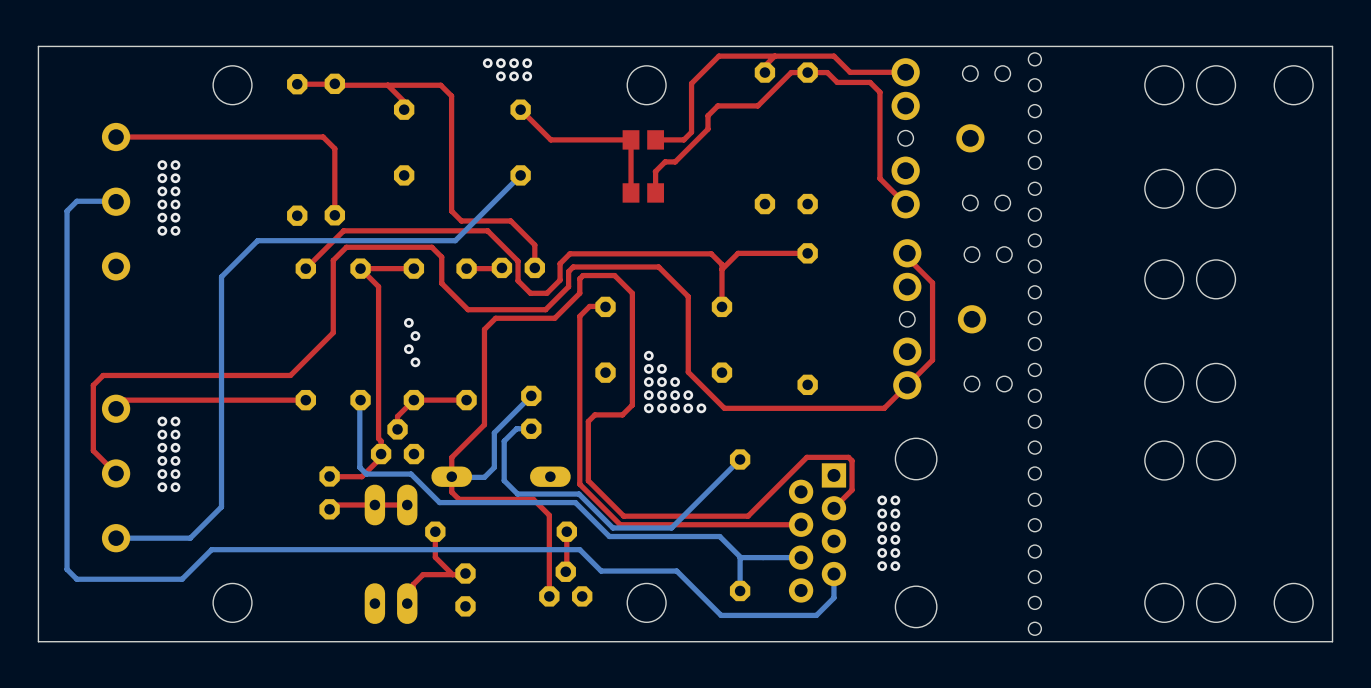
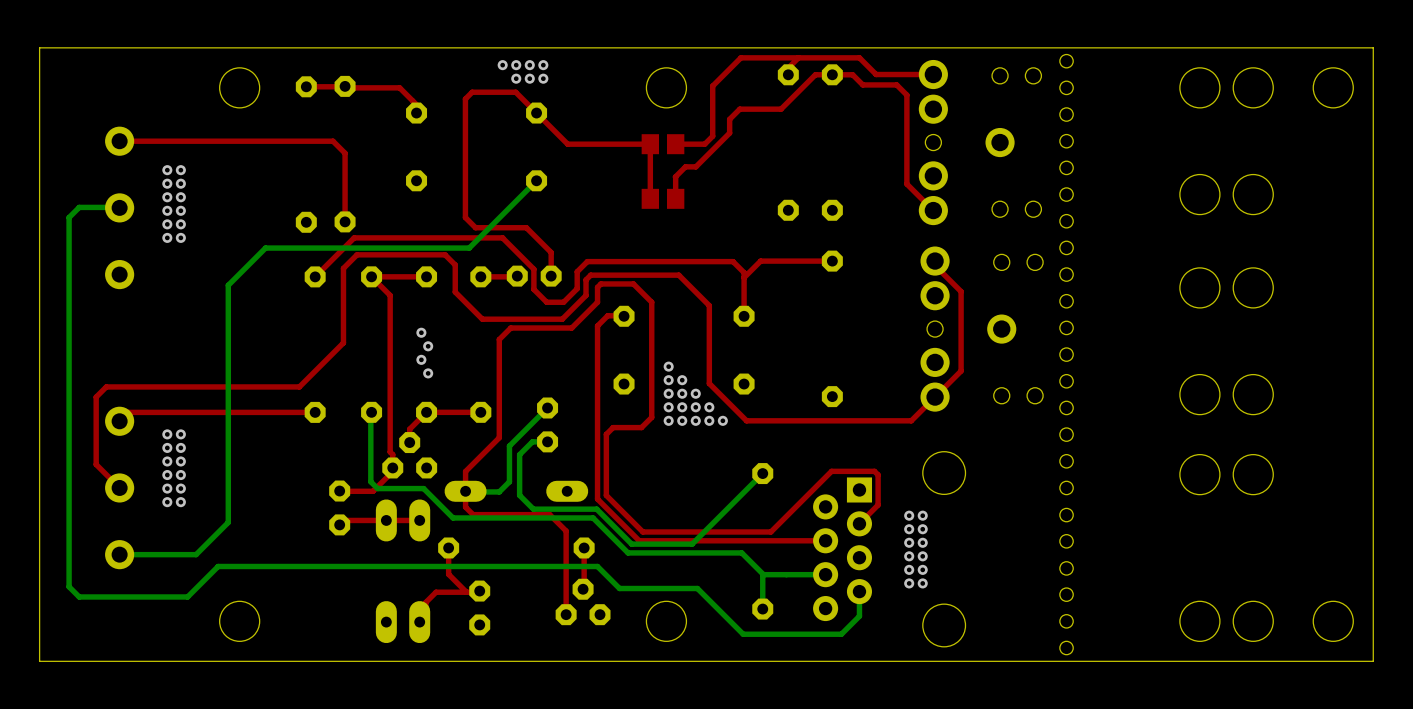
top track: (387, 85) (440, 85) (451, 96) -> (536, 113) (515, 92) (472, 92) (465, 99)

